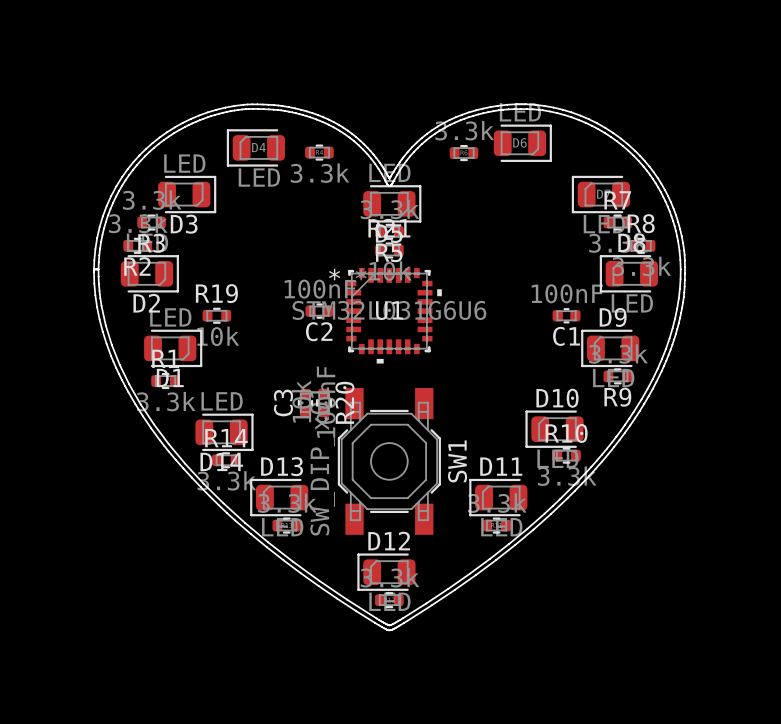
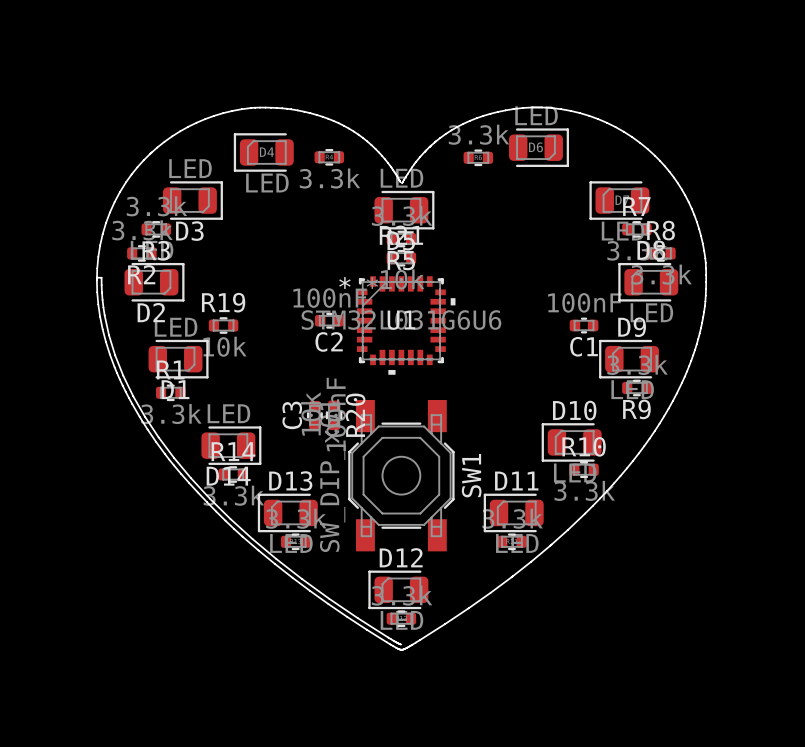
board edge: (391, 184) (406, 160) (421, 144) (439, 130) (460, 120) (483, 113) (508, 109) (538, 109) (564, 115) (585, 122) (610, 136) (628, 150) (646, 170) (660, 192) (671, 216) (678, 241) (680, 269) (677, 308) (662, 358) (641, 399) (607, 448) (560, 498) (509, 543) (448, 588) (389, 625) -> none
board edge: (388, 185) (375, 163) (358, 145) (339, 130) (322, 121) (296, 113) (273, 109) (246, 109) (215, 114) (192, 123) (168, 136) (149, 151) (132, 170) (119, 190) (108, 215) (101, 241) (98, 269) -> none

